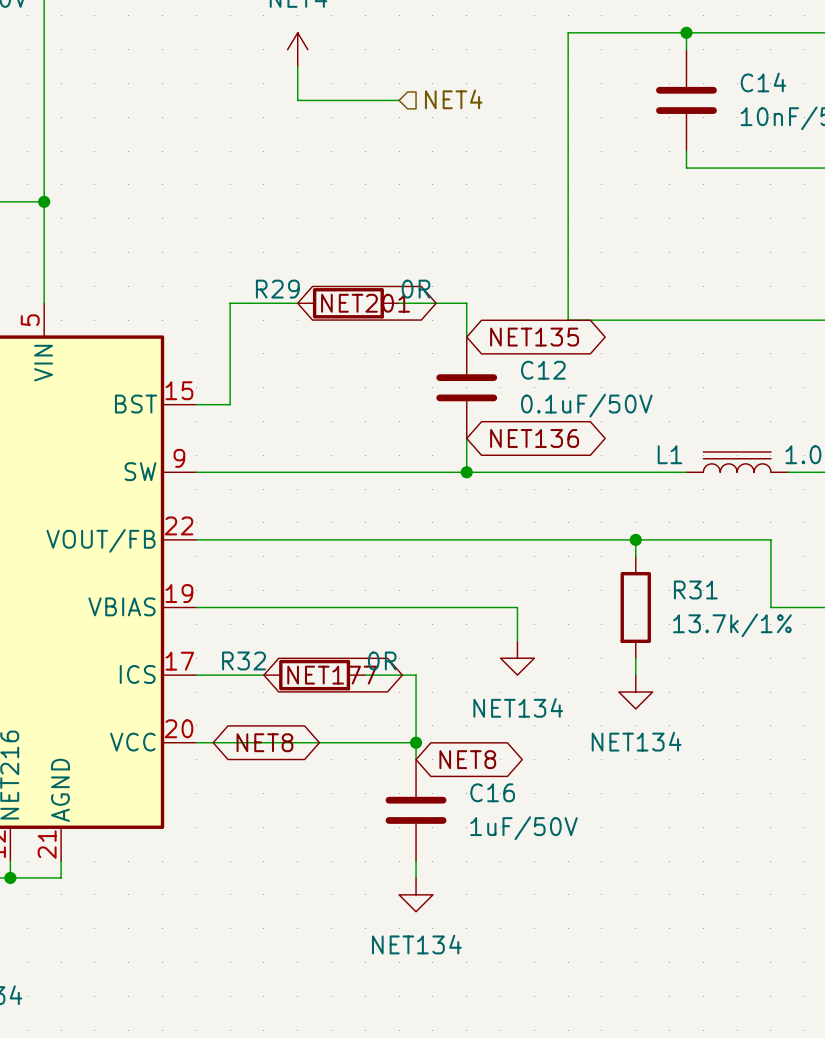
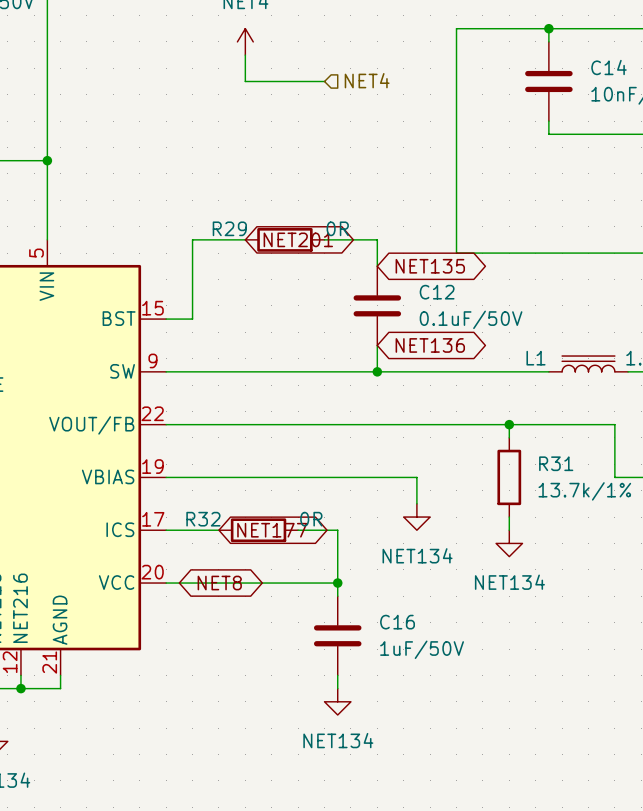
global label: NET8 (467, 759) -> none

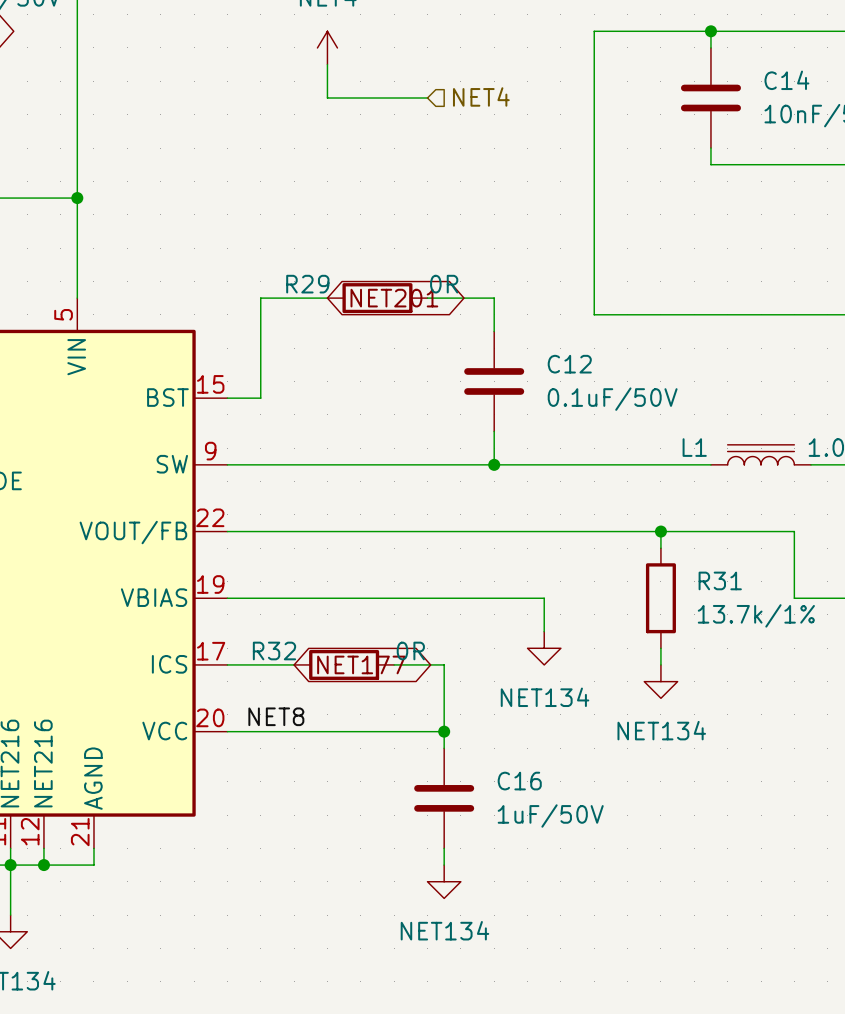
global label: NET135 (430, 266) -> none
global label: NET136 (430, 345) -> none
label: none -> NET8 (276, 716)
global label: NET8 (219, 583) -> none

